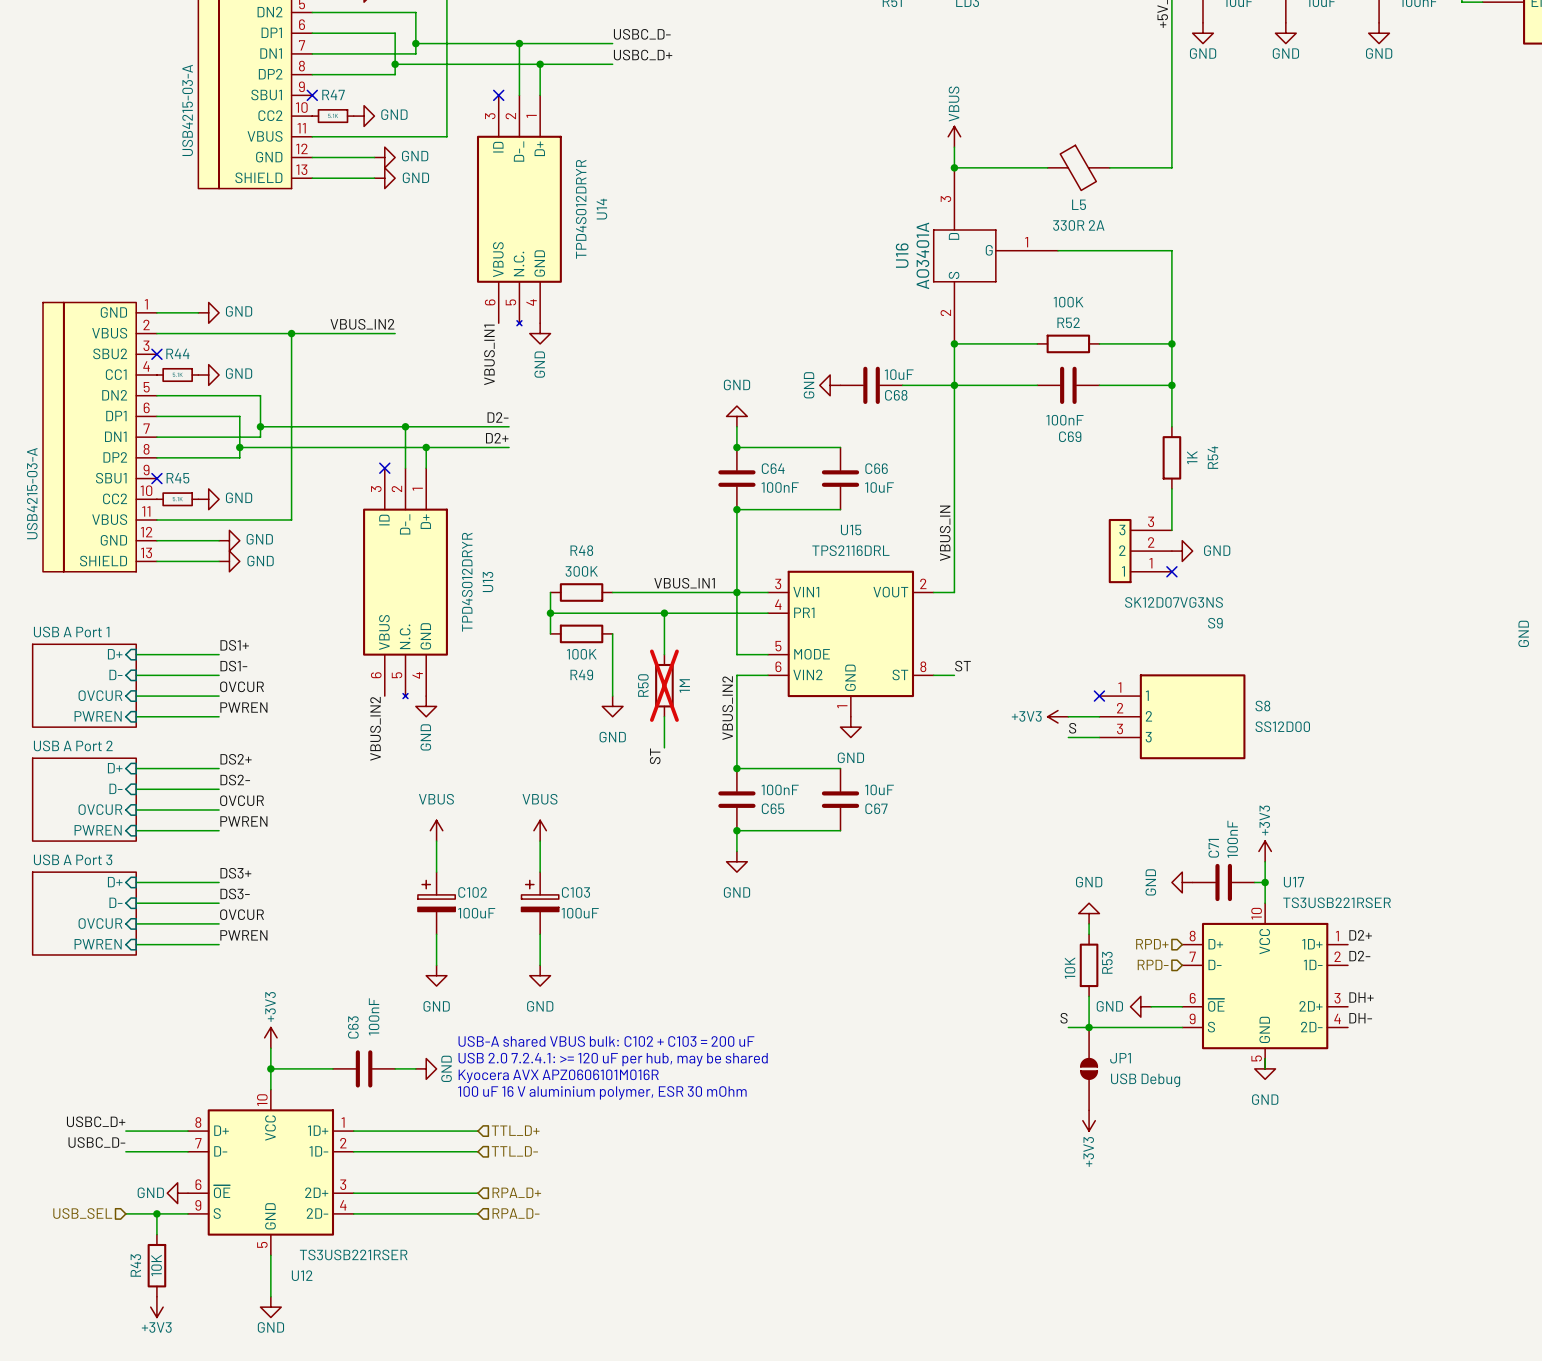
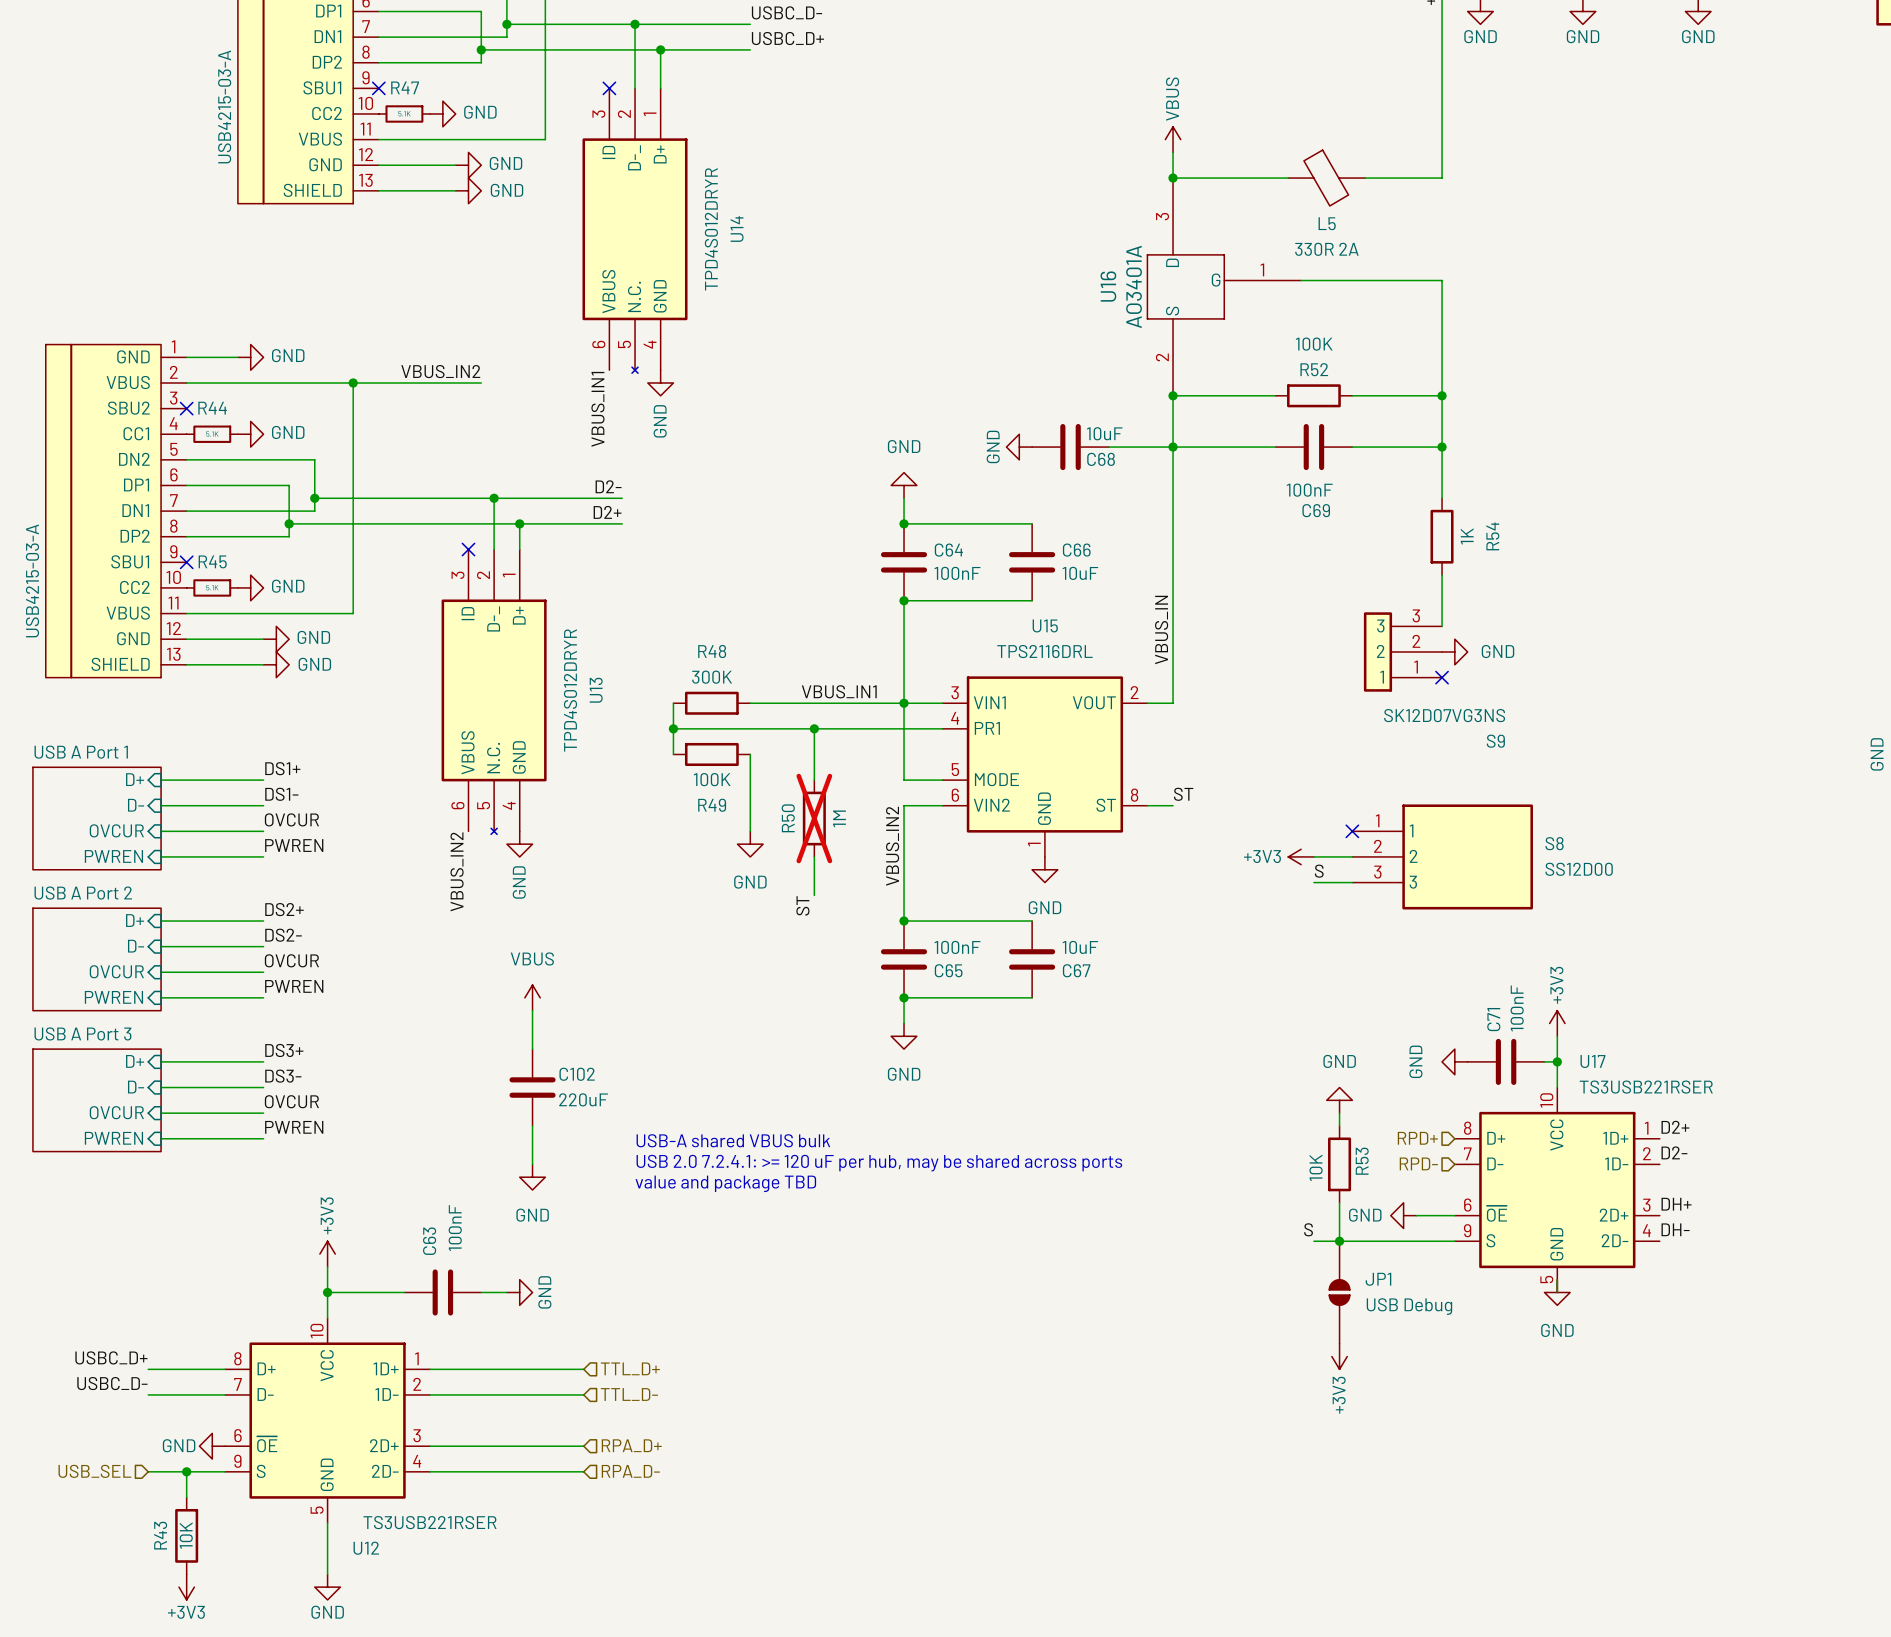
power symbol: VBUS (540, 830) -> none
wire: (540, 841) (540, 872) -> none
C102 symbol: [417, 872, 456, 935] -> [509, 1049, 556, 1126]
C103: 100uF (540, 903) -> none
C102 value: 100uF (476, 913) -> 220uF (583, 1099)
wire: (540, 934) (540, 965) -> none
text: none -> USB-A shared VBUS bulk (733, 1140)
text: none -> USB 2.0 7.2.4.1: >= 120 uF per hub, may be shared across ports (879, 1163)
power symbol: GND (540, 975) -> none
text: none -> value and package TBD (725, 1183)
text: USB-A shared VBUS bulk: C102 + C103 = 200 uF (606, 1041) -> none
text: USB 2.0 7.2.4.1: >= 120 uF per hub, may be shared (613, 1059) -> none
text: Kyocera AVX APZ0606101M016R (558, 1076) -> none
text: 100 uF 16 V aluminium polymer, ESR 30 mOhm (602, 1092) -> none

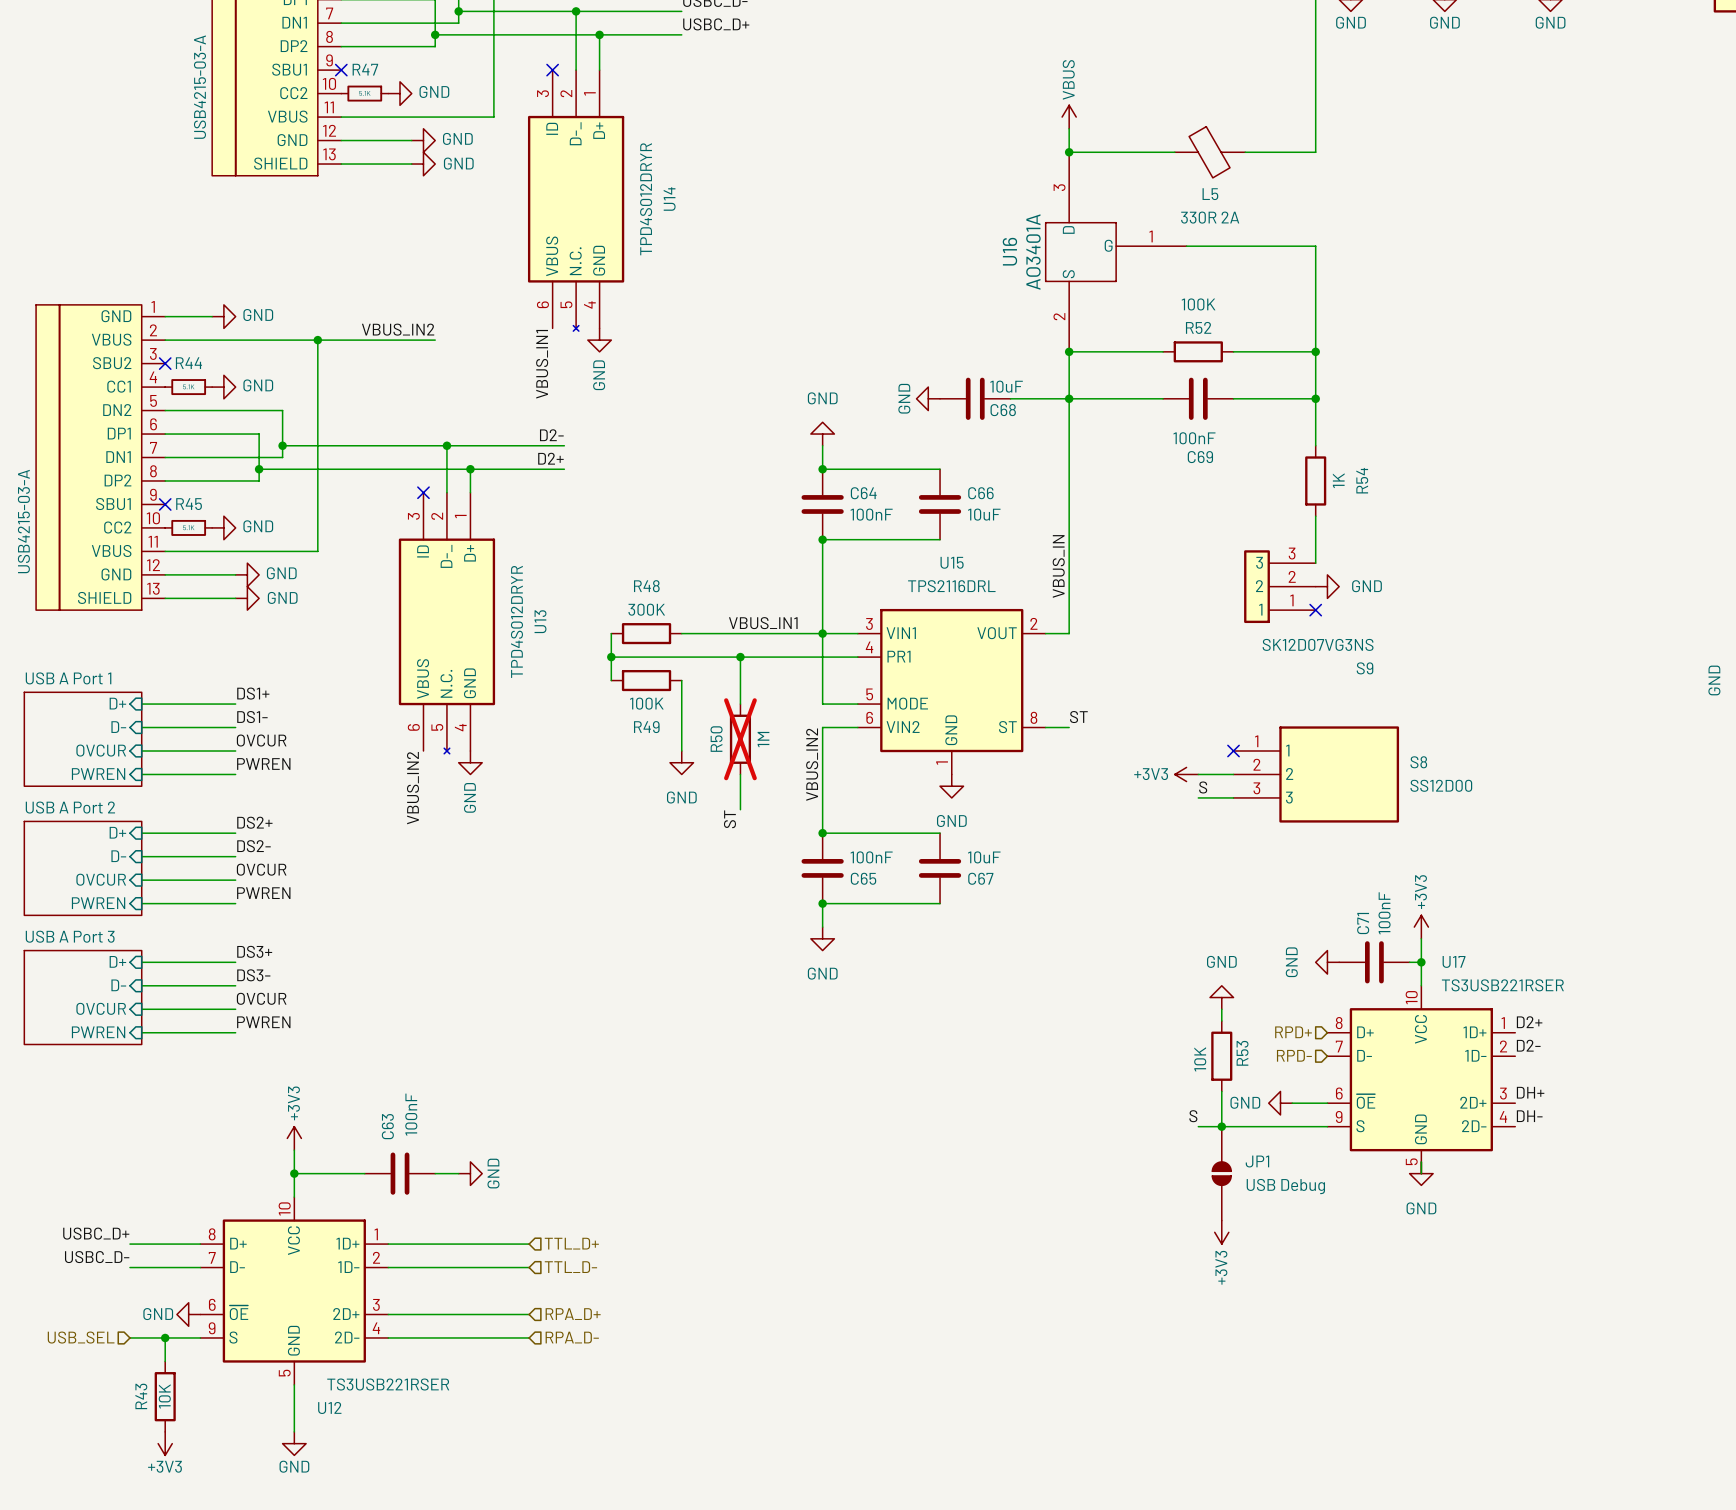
power symbol: VBUS (532, 997) -> none
wire: (532, 1010) (532, 1049) -> none
C102: 220uF (532, 1087) -> none
wire: (532, 1125) (532, 1164) -> none
text: USB-A shared VBUS bulk (733, 1140) -> none
text: USB 2.0 7.2.4.1: >= 120 uF per hub, may be shared across ports (879, 1163) -> none
power symbol: GND (532, 1177) -> none
text: value and package TBD (725, 1183) -> none

